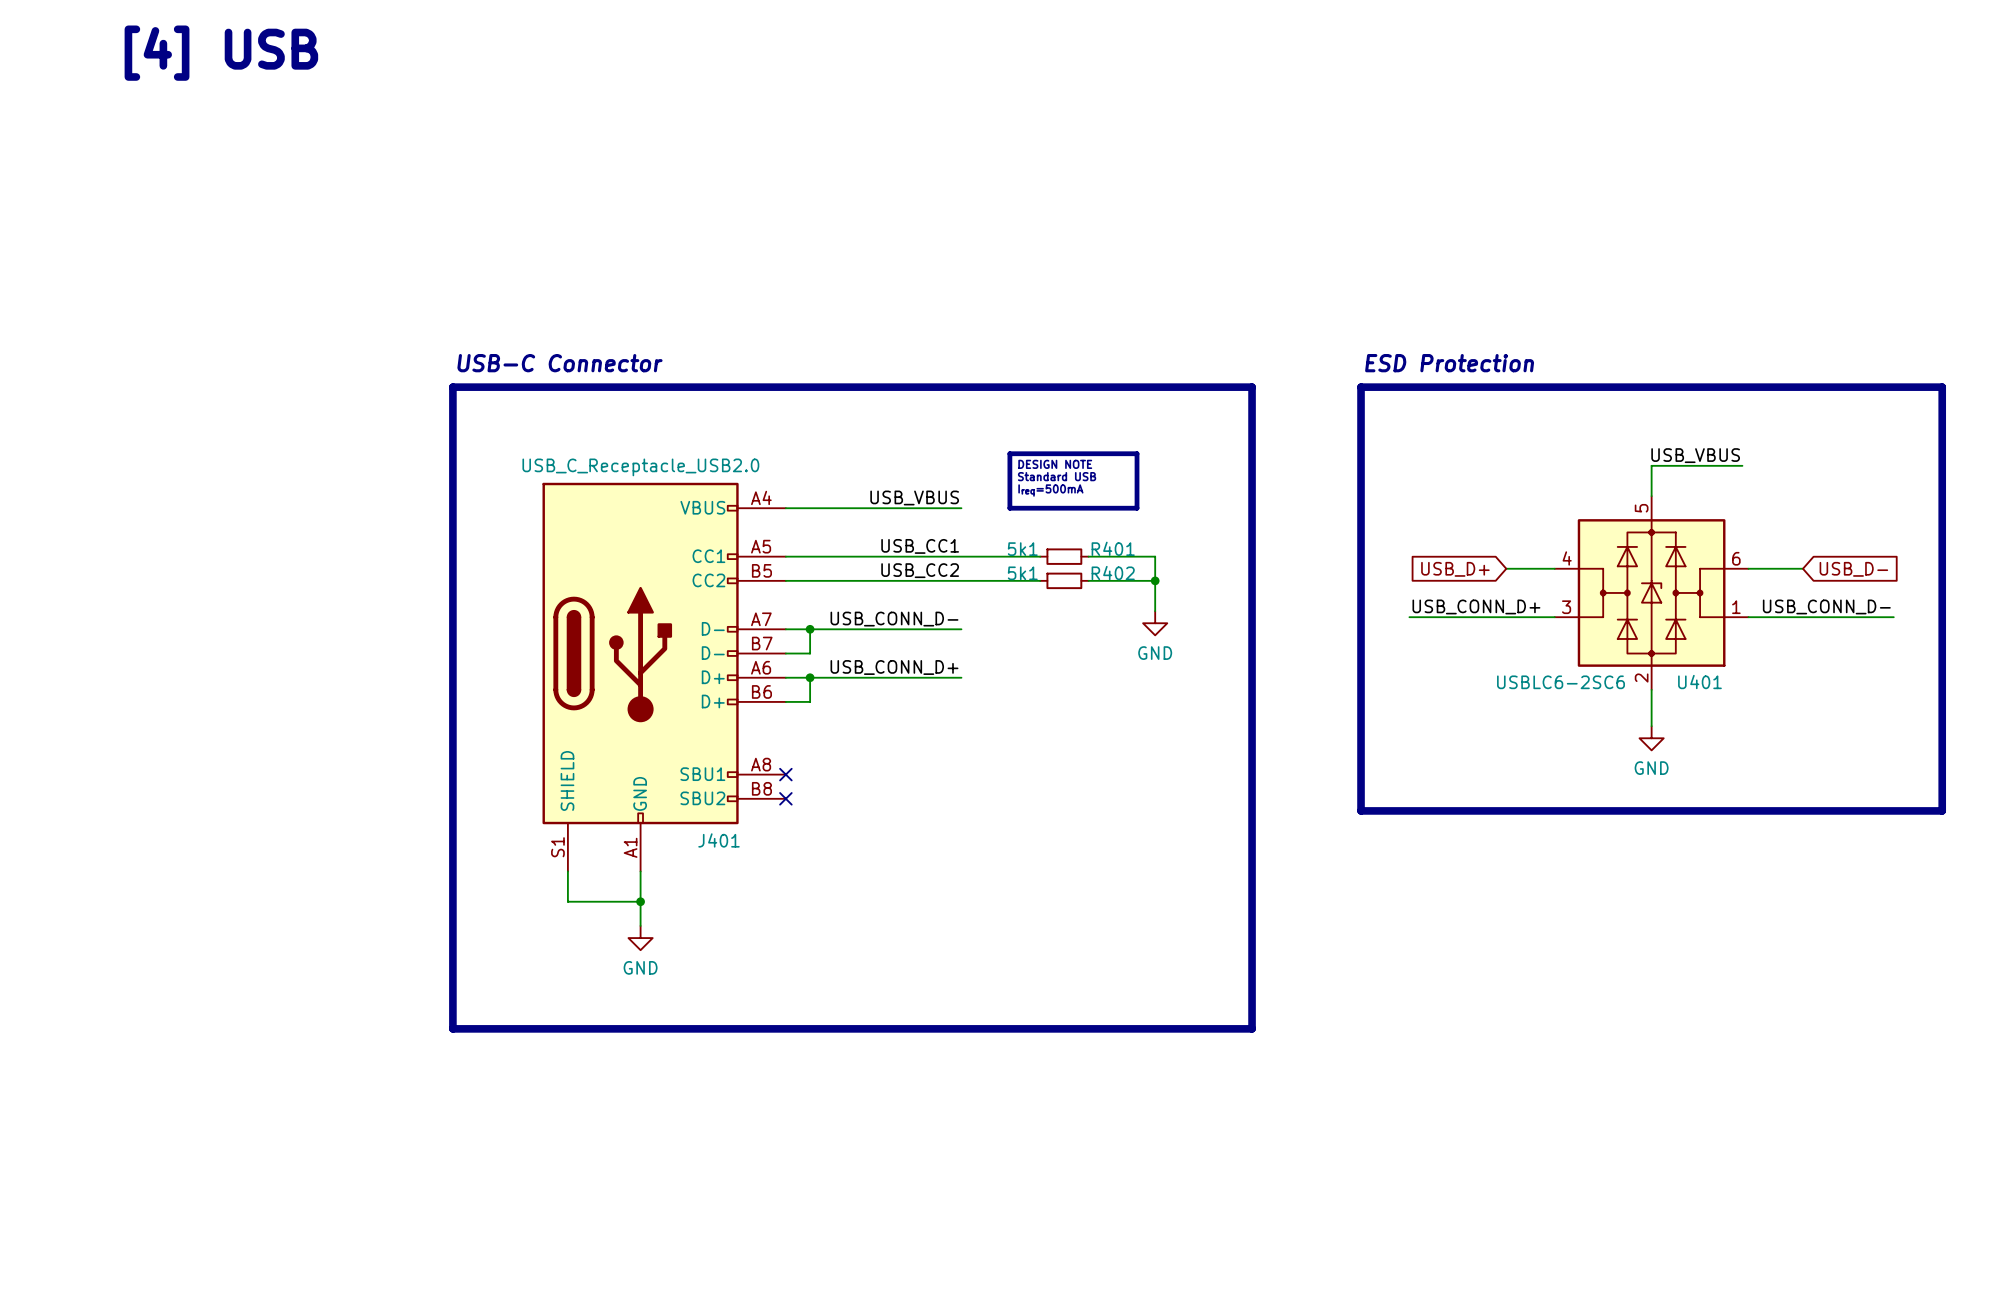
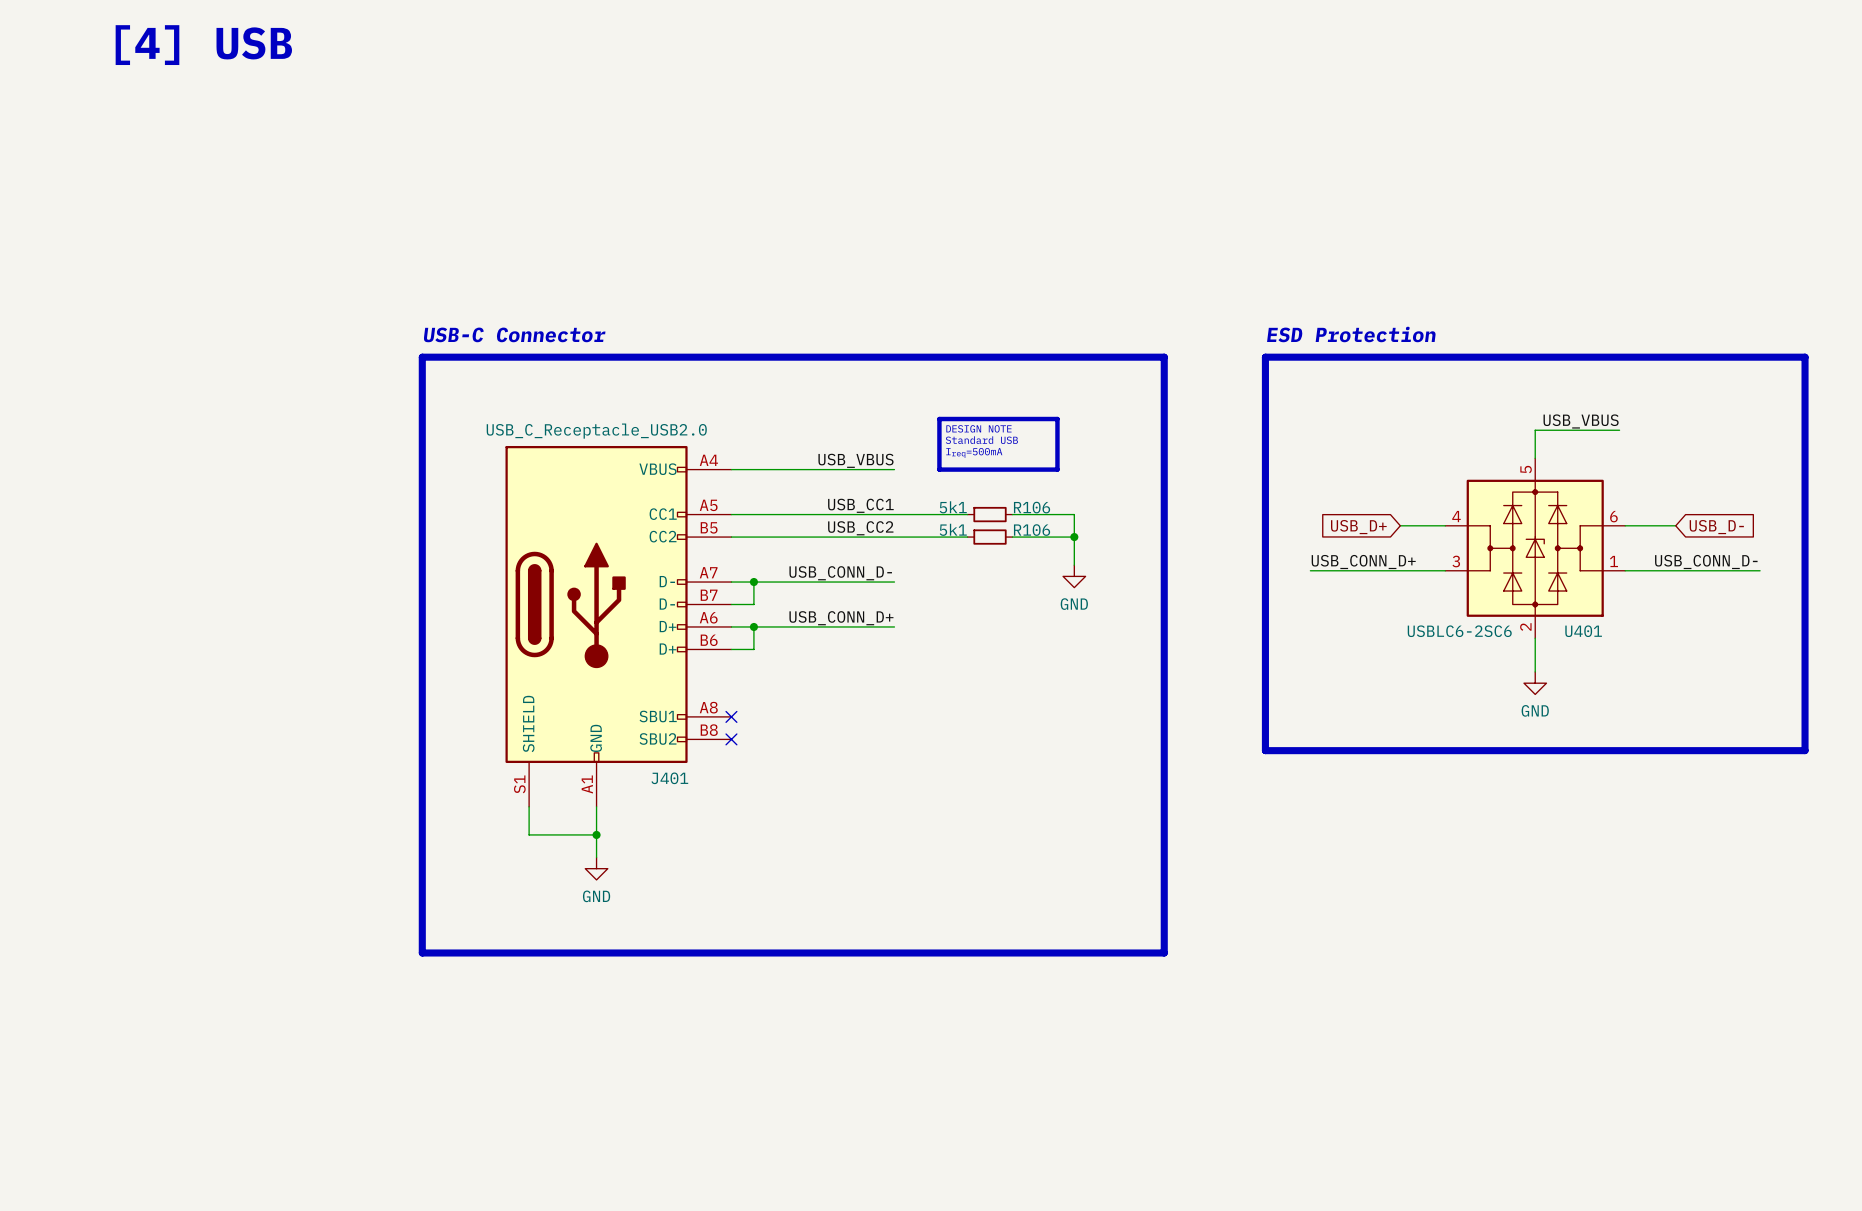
R401 name: R401 (1113, 548) -> R106 (1032, 507)
R402 name: R402 (1113, 573) -> R106 (1032, 530)

